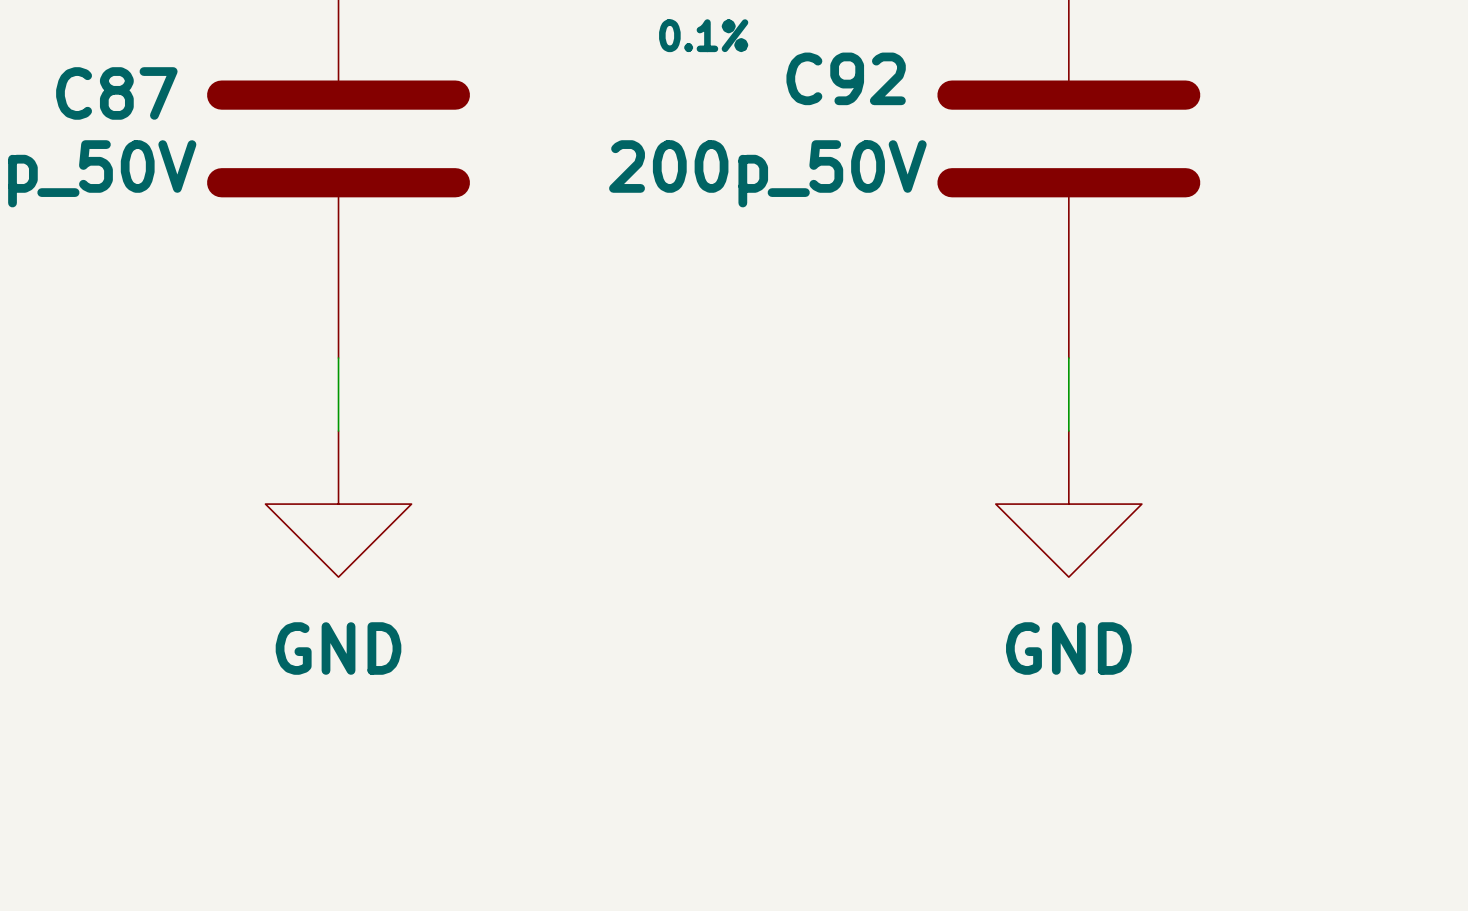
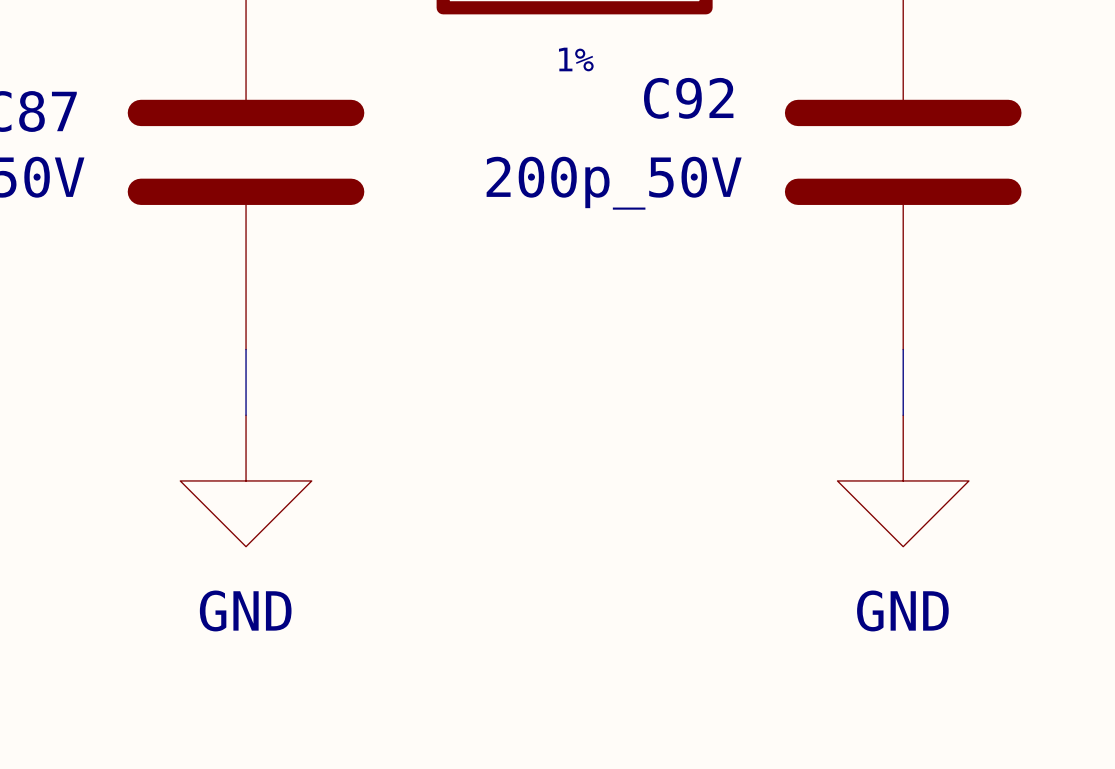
part text: 0.1% (703, 35) -> 1% (576, 59)

